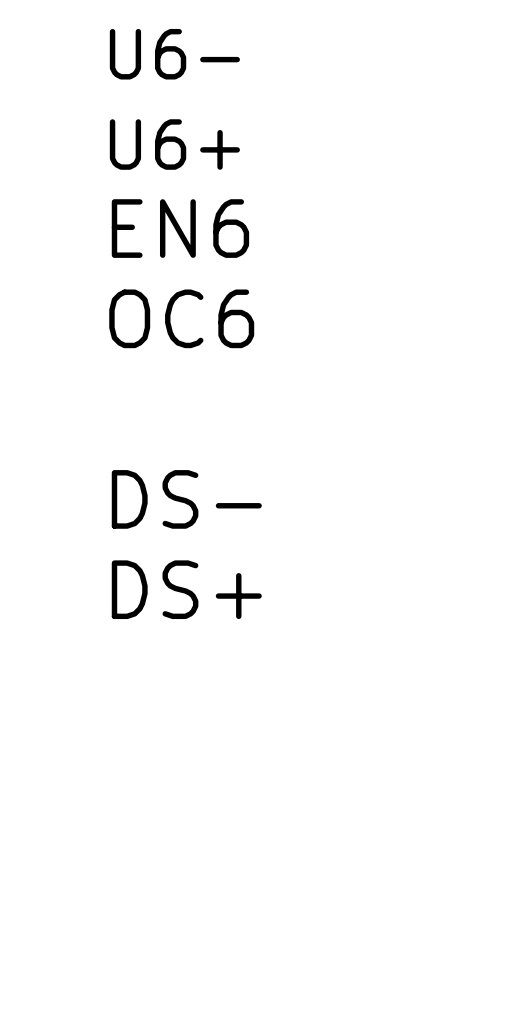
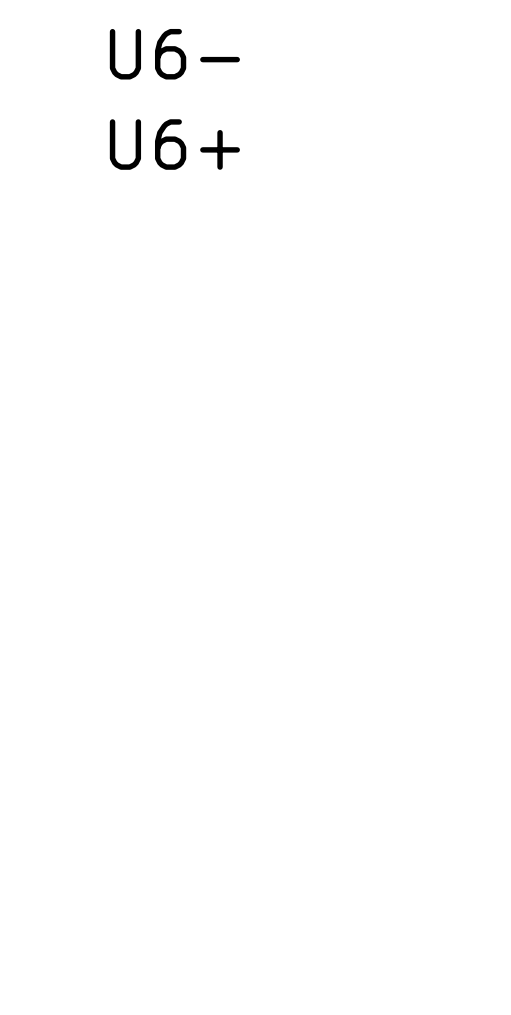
label: EN6 (180, 228) -> none
label: OC6 (181, 318) -> none
label: DS- (186, 499) -> none
label: DS+ (186, 589) -> none

